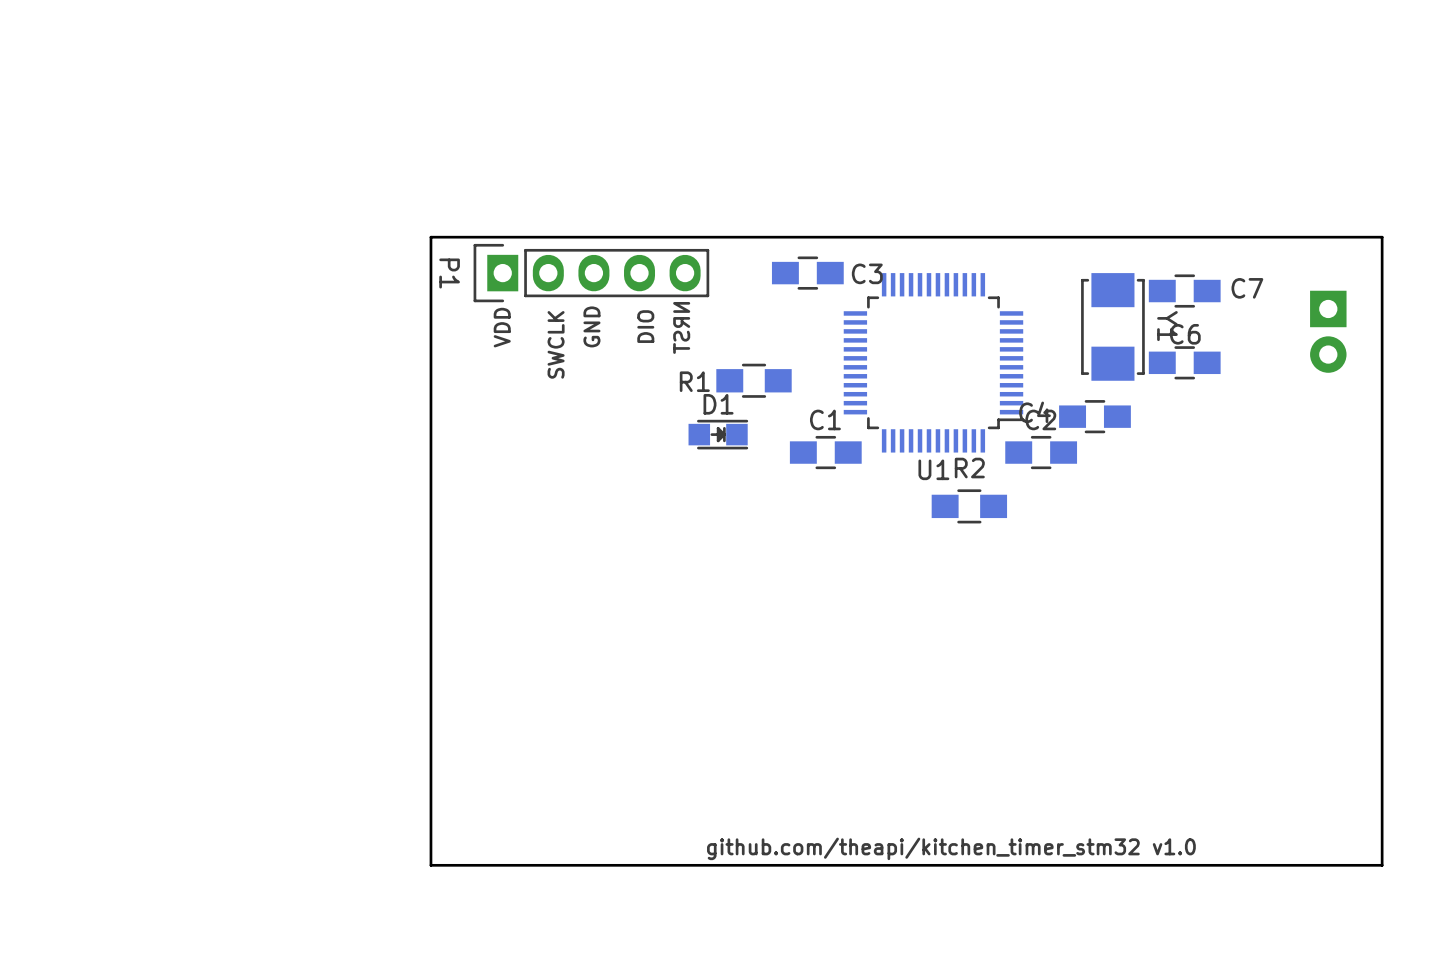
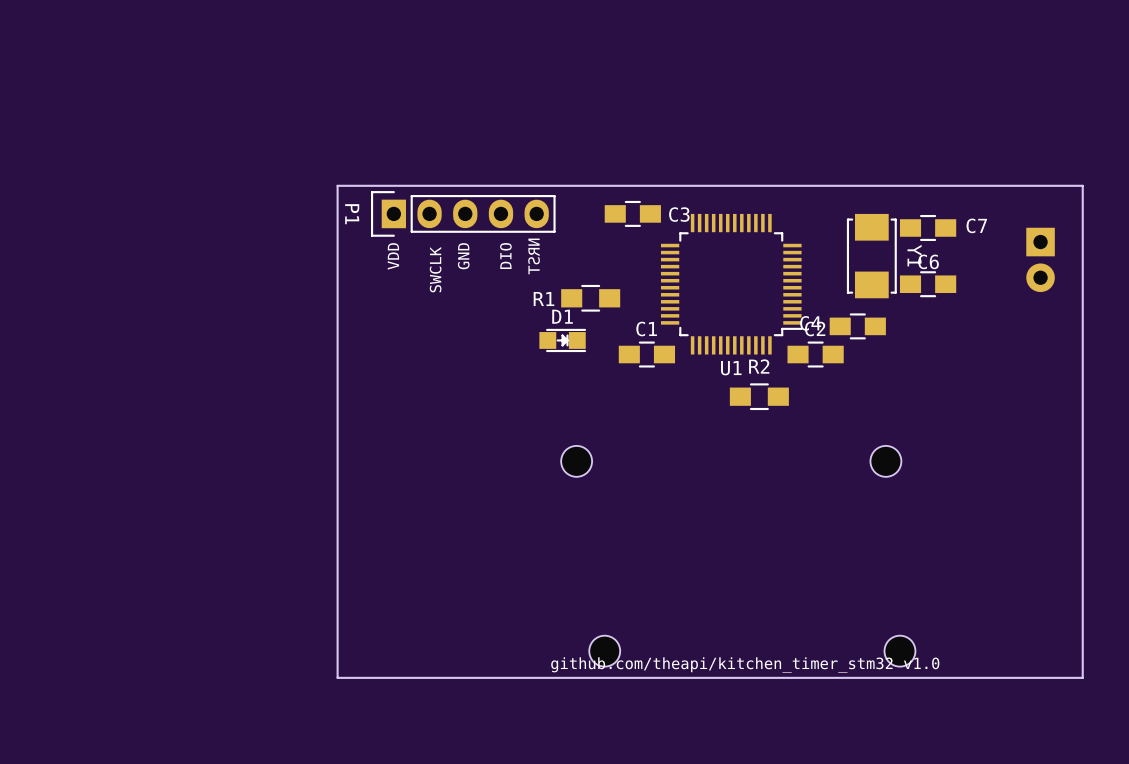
part: none -> (576, 461)
part: none -> (885, 461)
part: none -> (604, 651)
part: none -> (899, 651)

